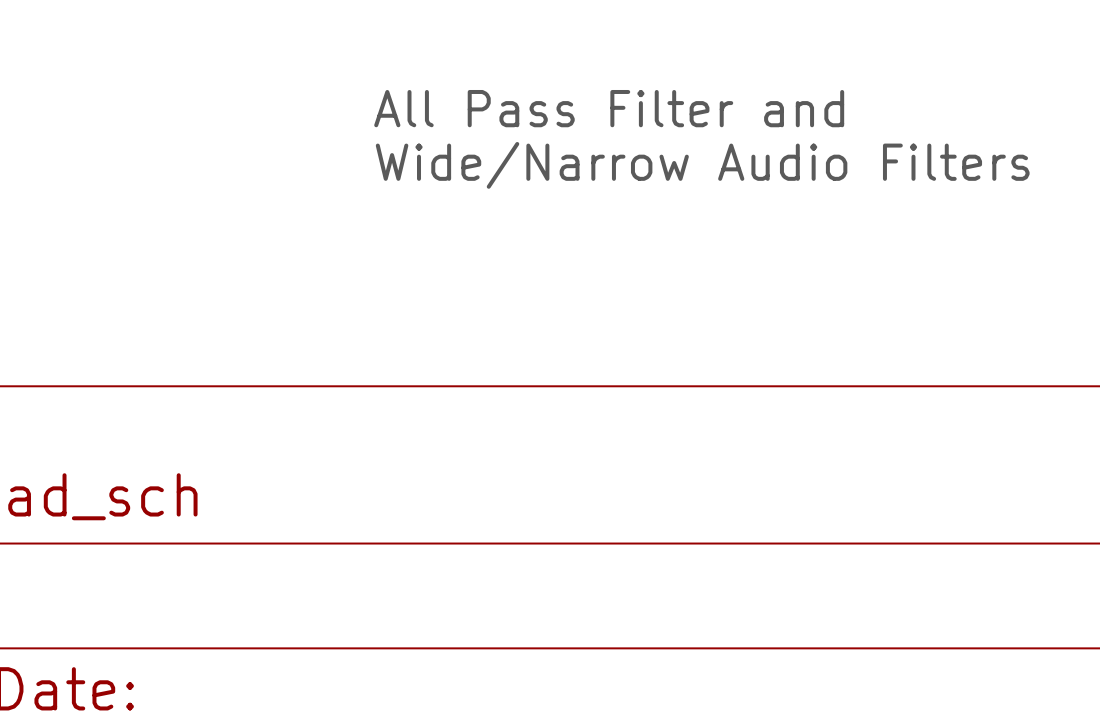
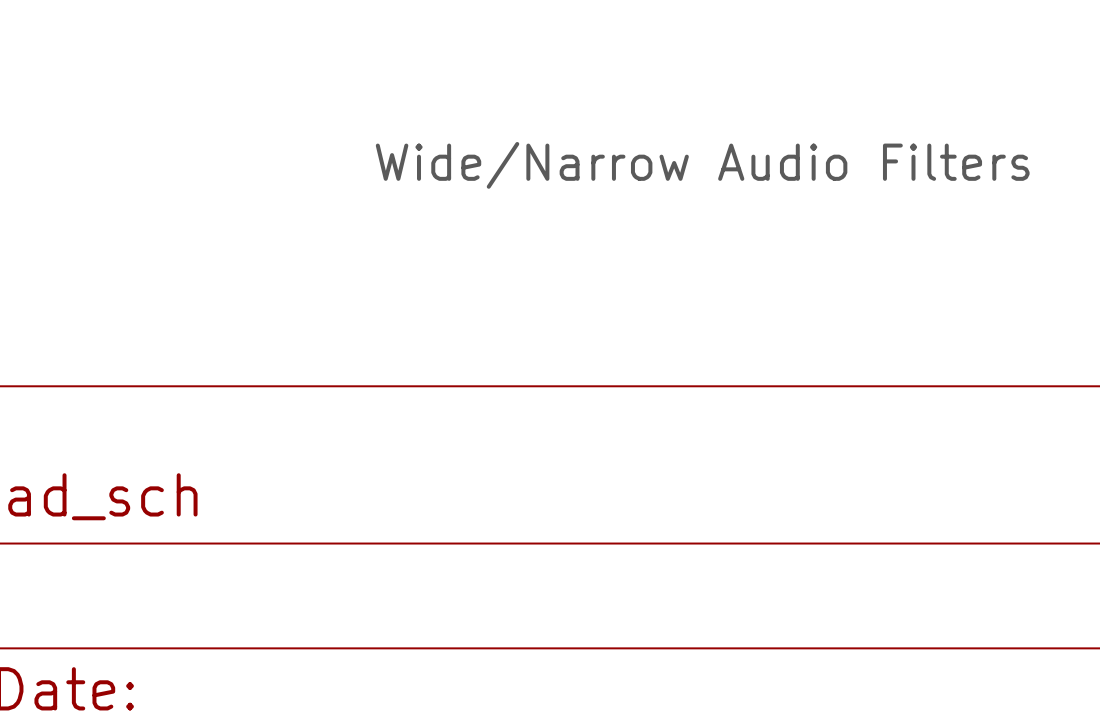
text: All Pass Filter and (609, 108) -> none

